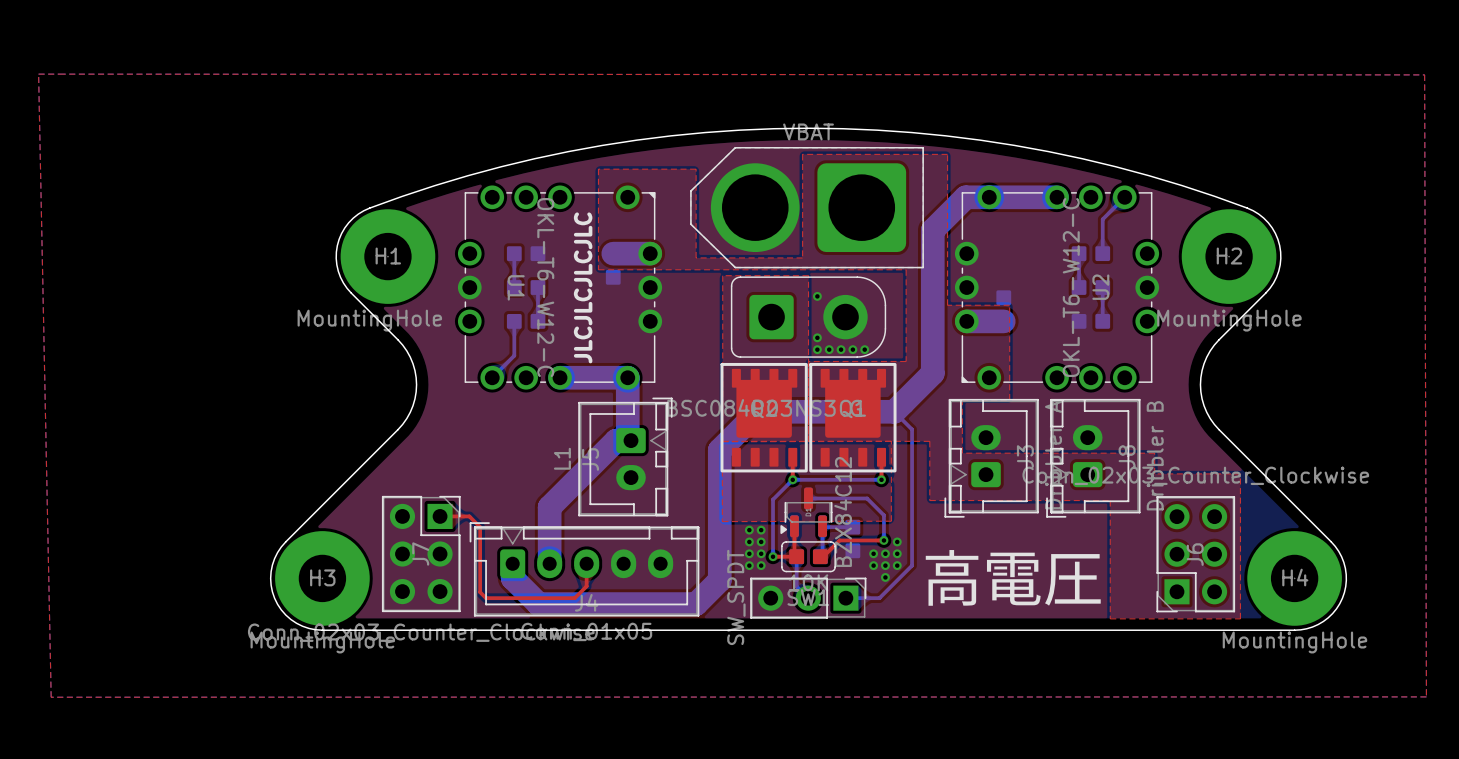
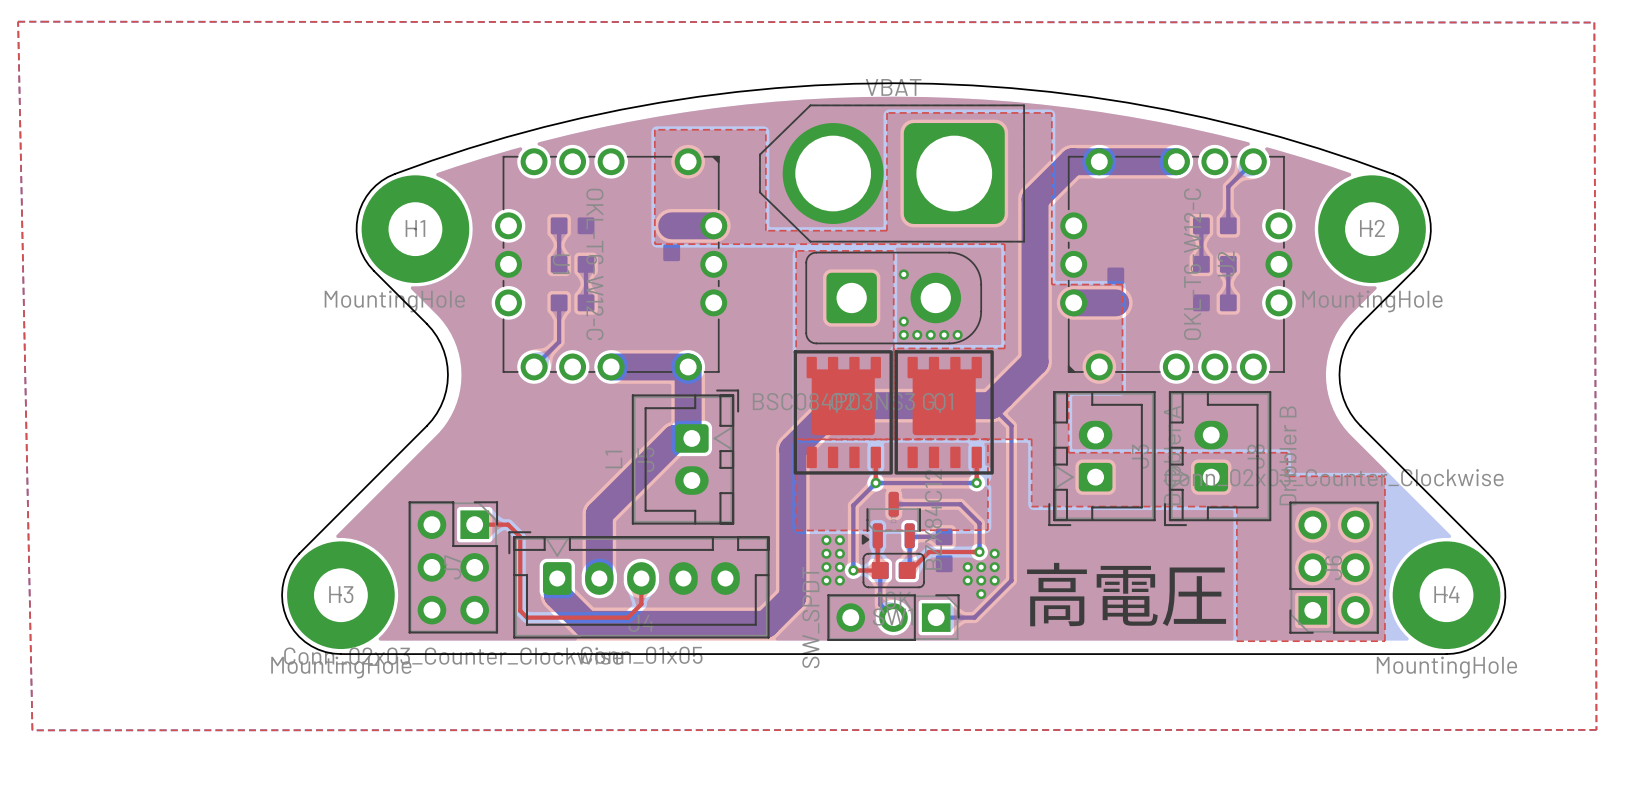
text: JLCJLCJLCJLC (583, 287) -> none

